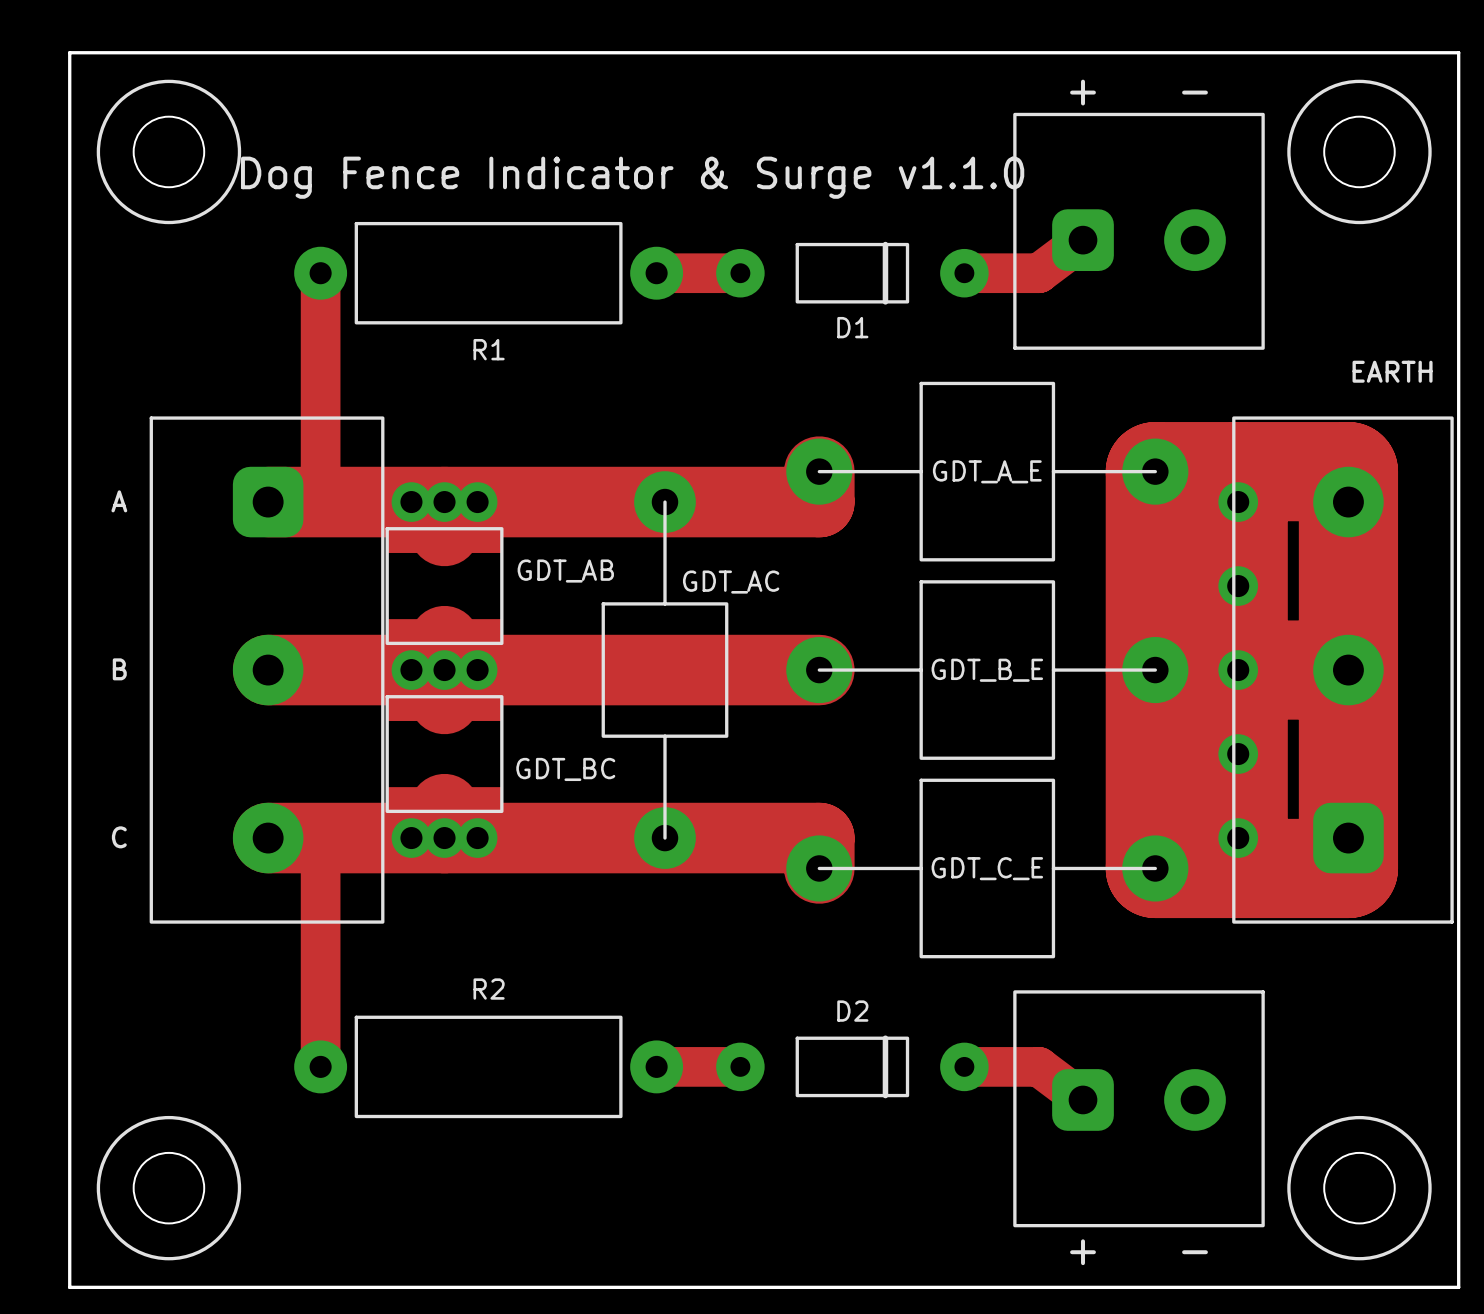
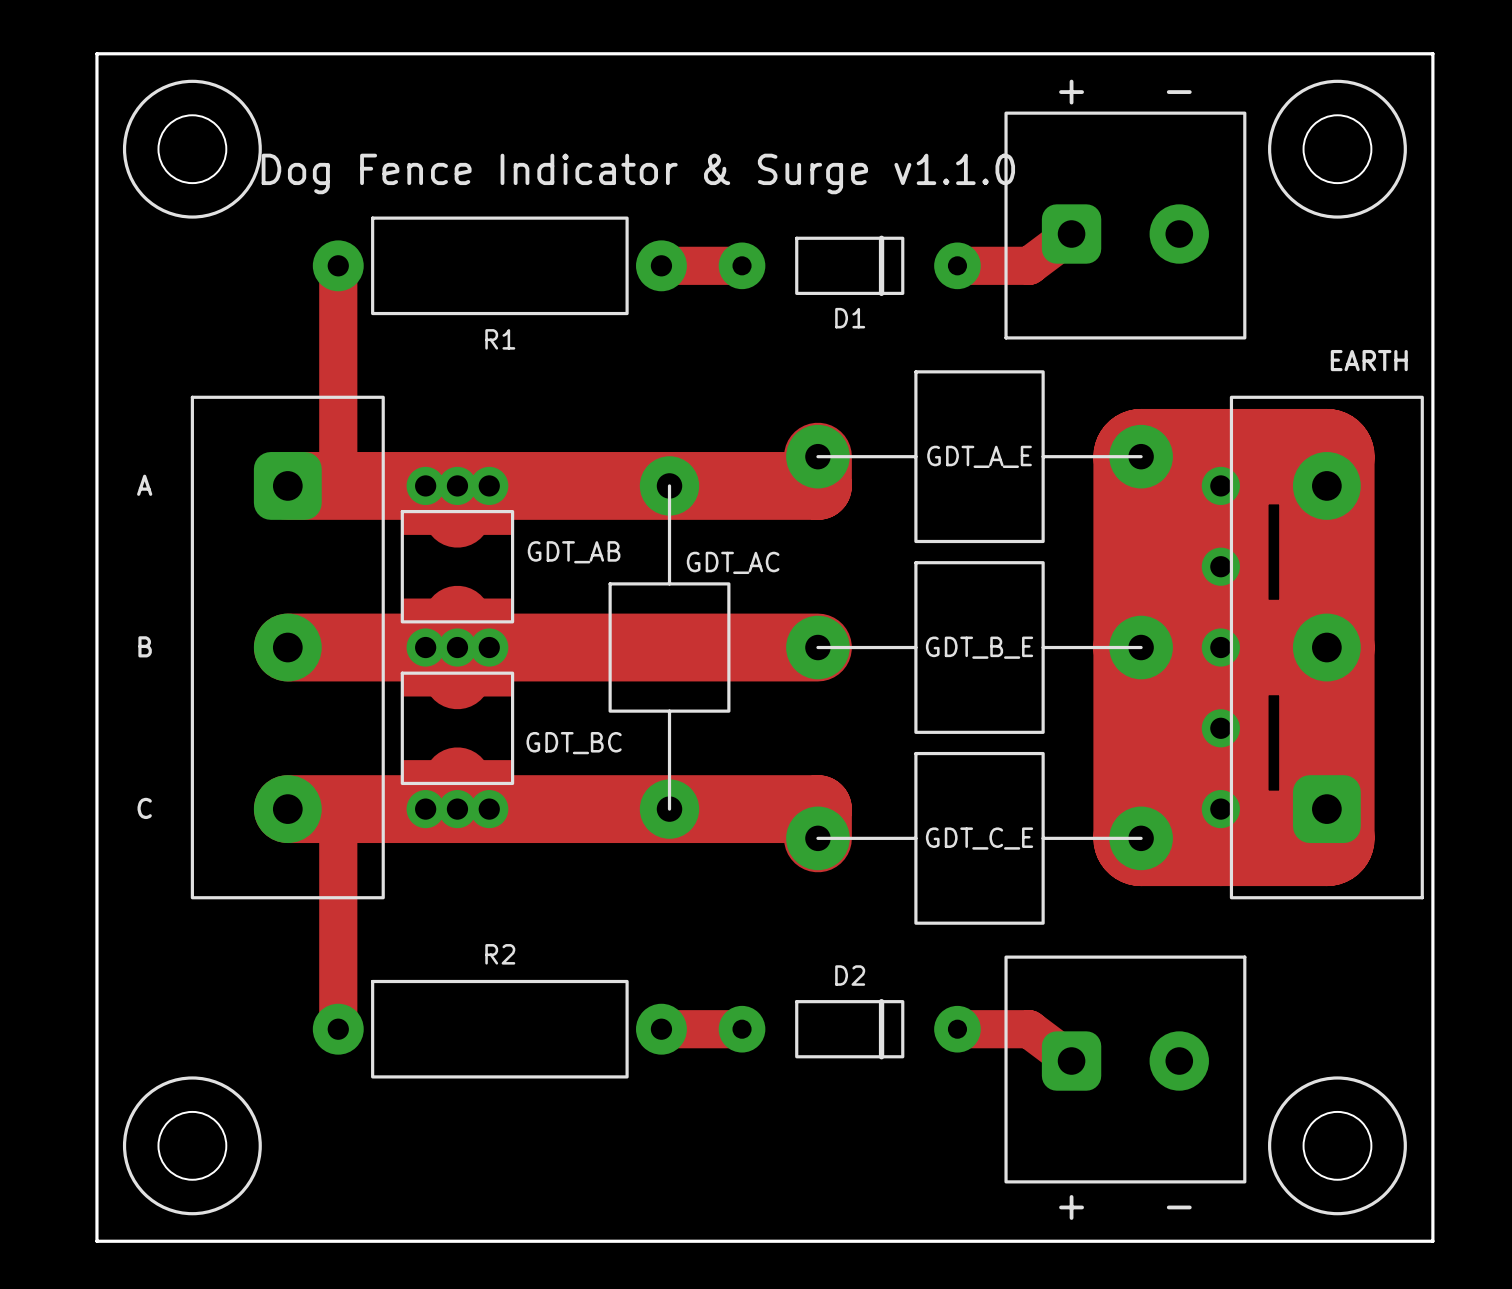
part footprint: [149, 416, 385, 924] -> [190, 395, 385, 900]
part footprint: [1232, 416, 1454, 924] -> [1229, 395, 1424, 900]

